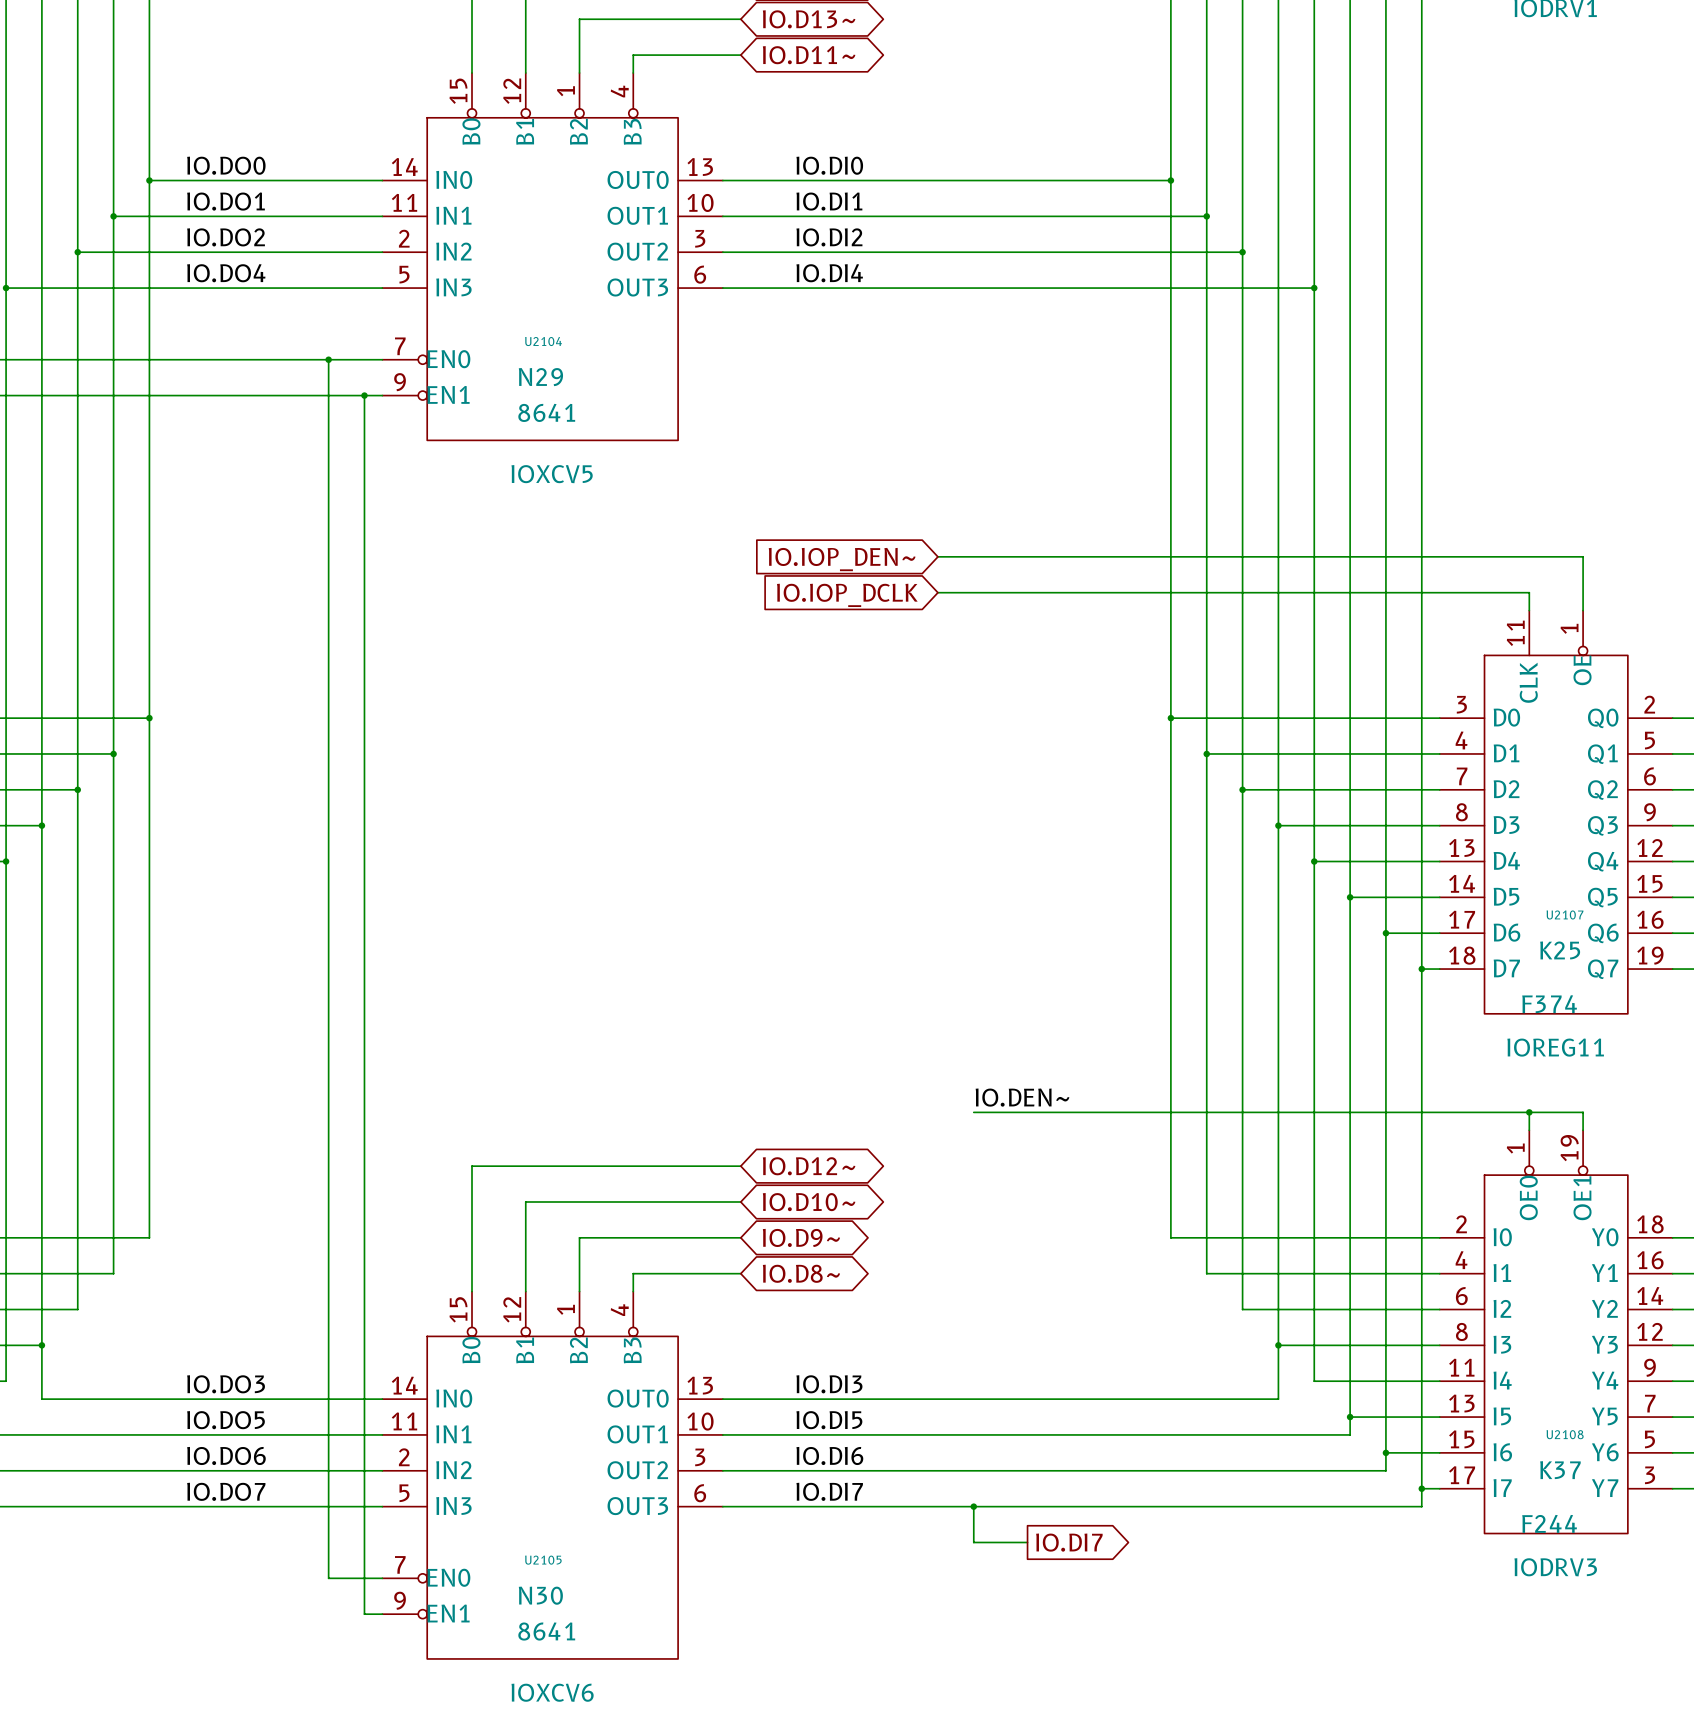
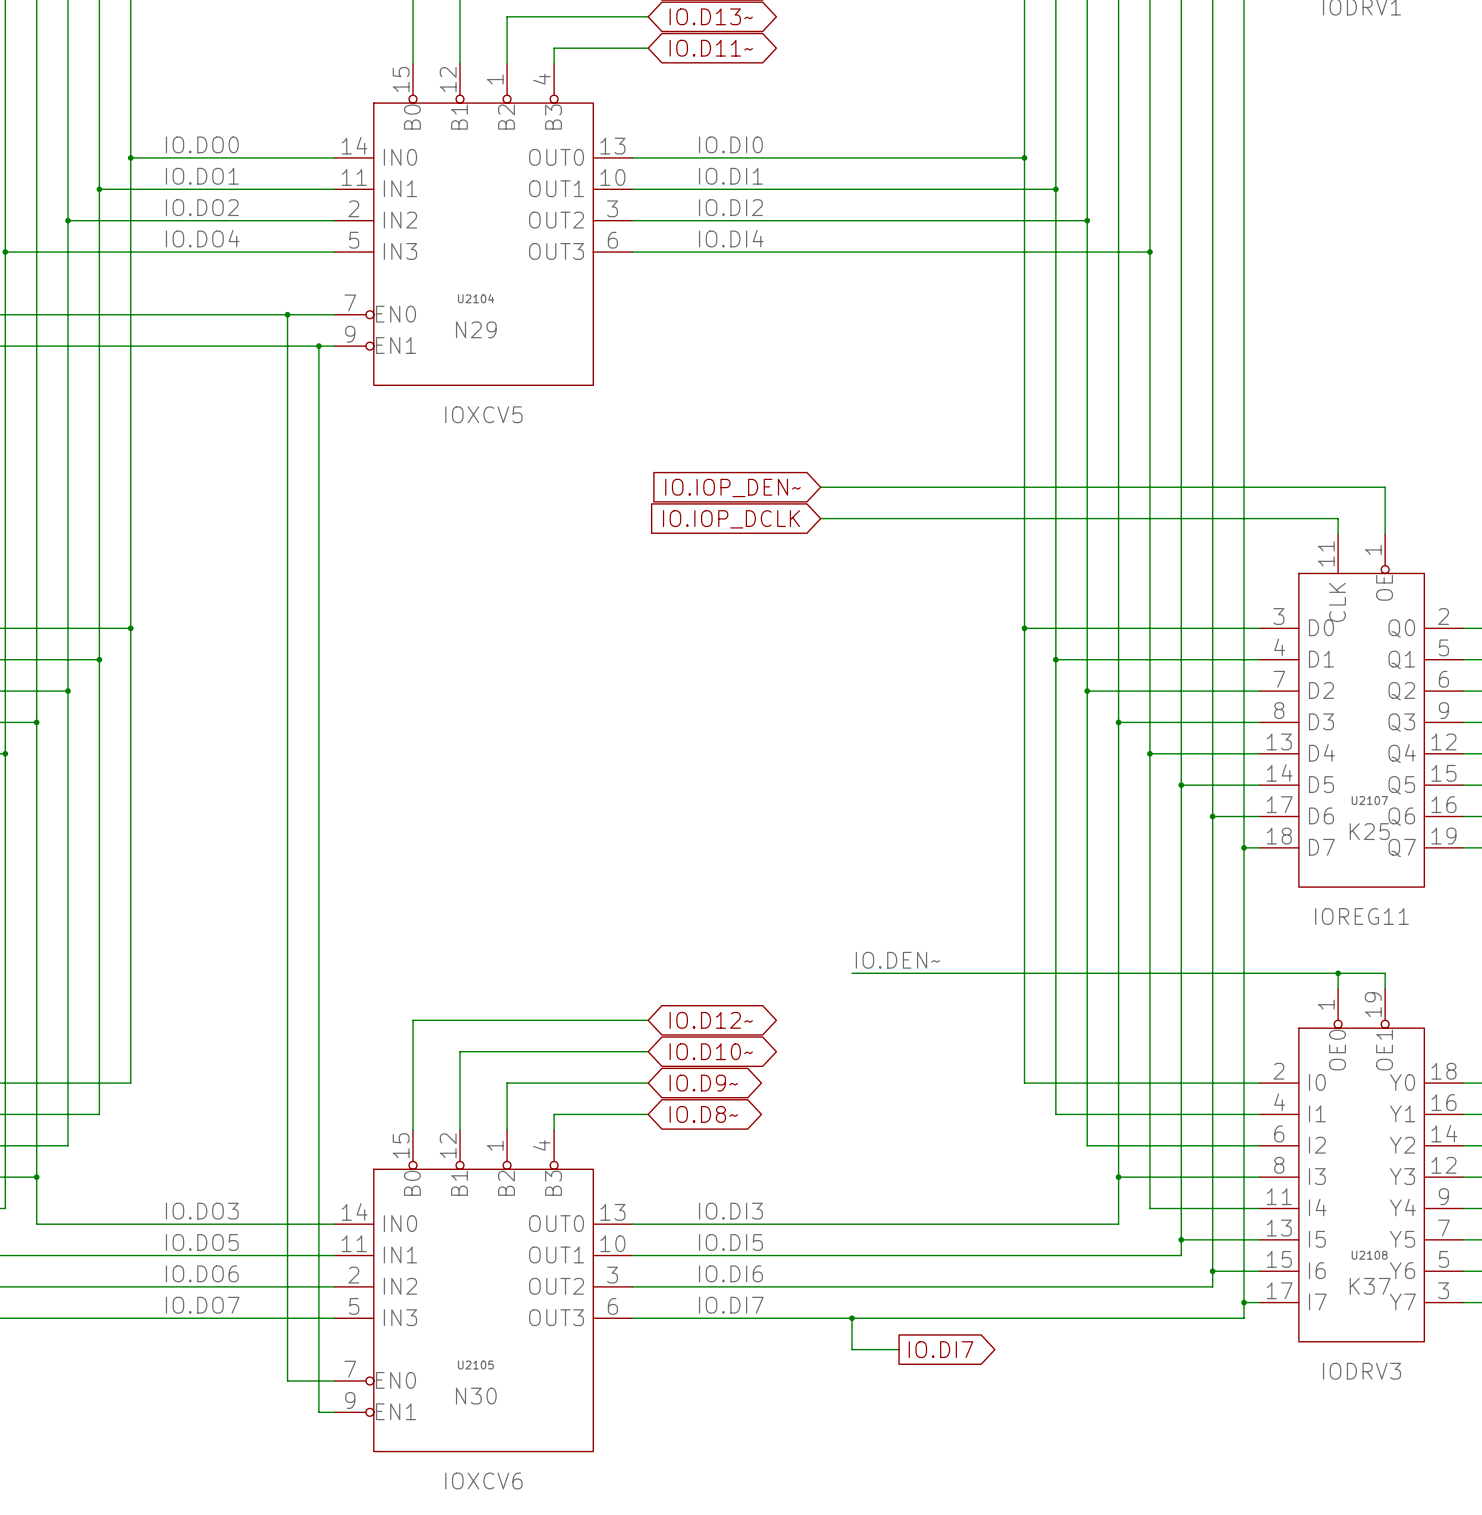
U2104 value: 8641 (546, 412) -> none
U2107 value: F374 (1549, 1004) -> none
U2108 value: F244 (1549, 1523) -> none
U2105 value: 8641 (546, 1631) -> none

